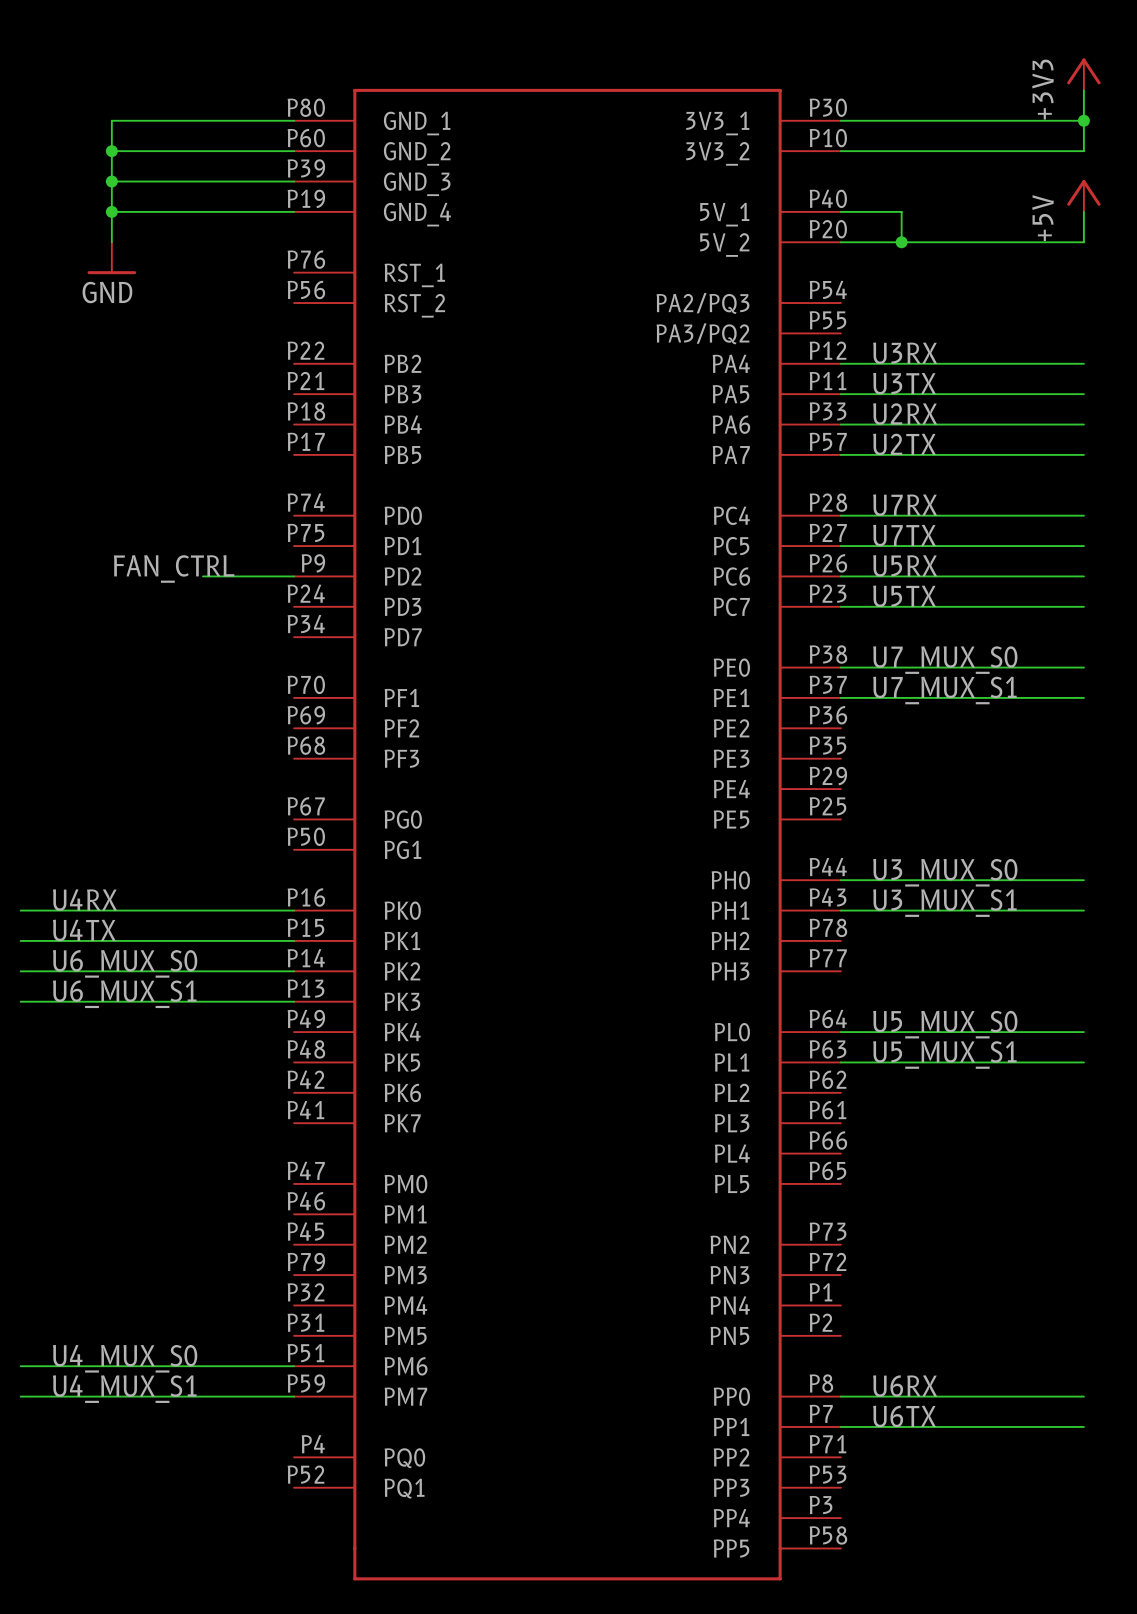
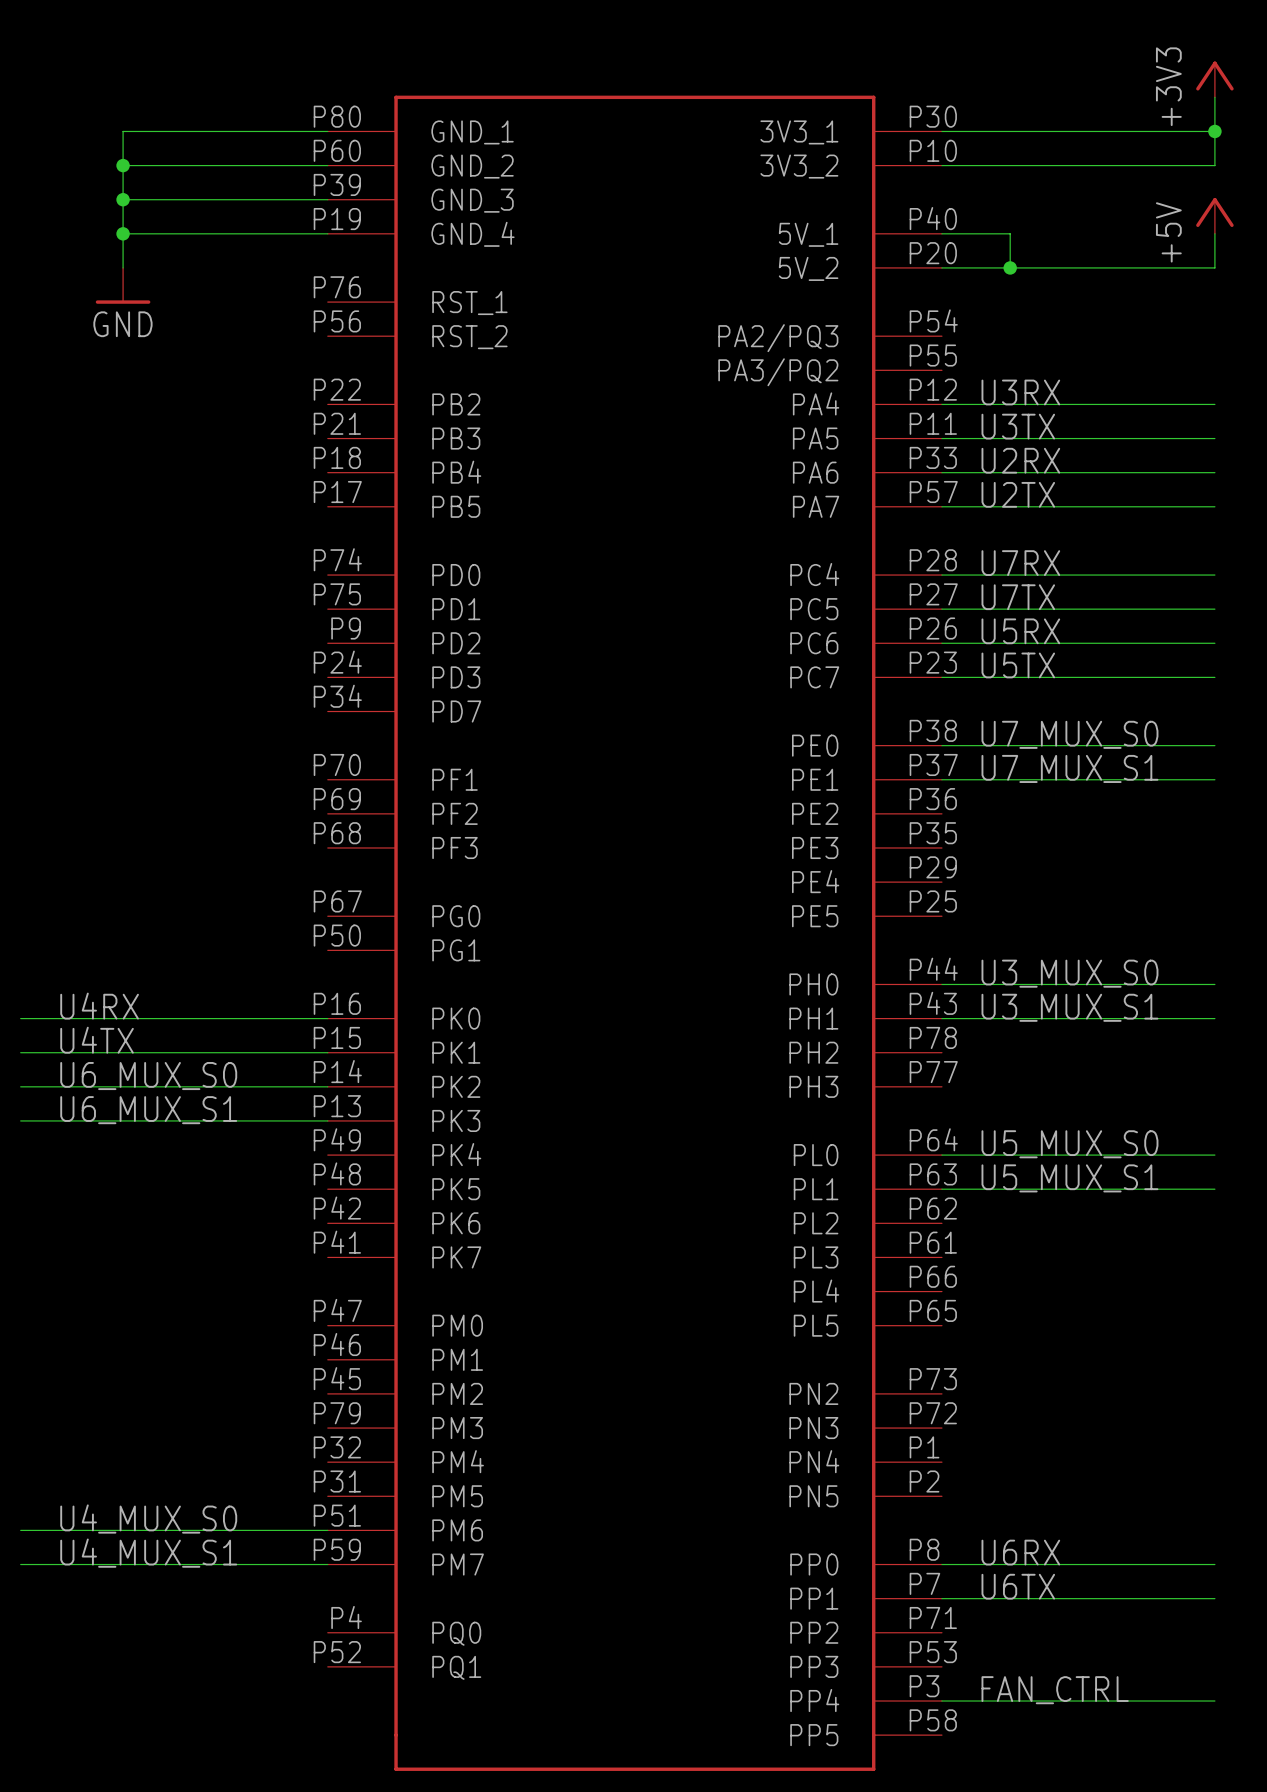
label: FAN_CTRL (174, 568) -> none
wire: (202, 576) (294, 576) -> none
label: none -> FAN_CTRL (1055, 1690)
wire: none -> (941, 1701) (1214, 1701)

